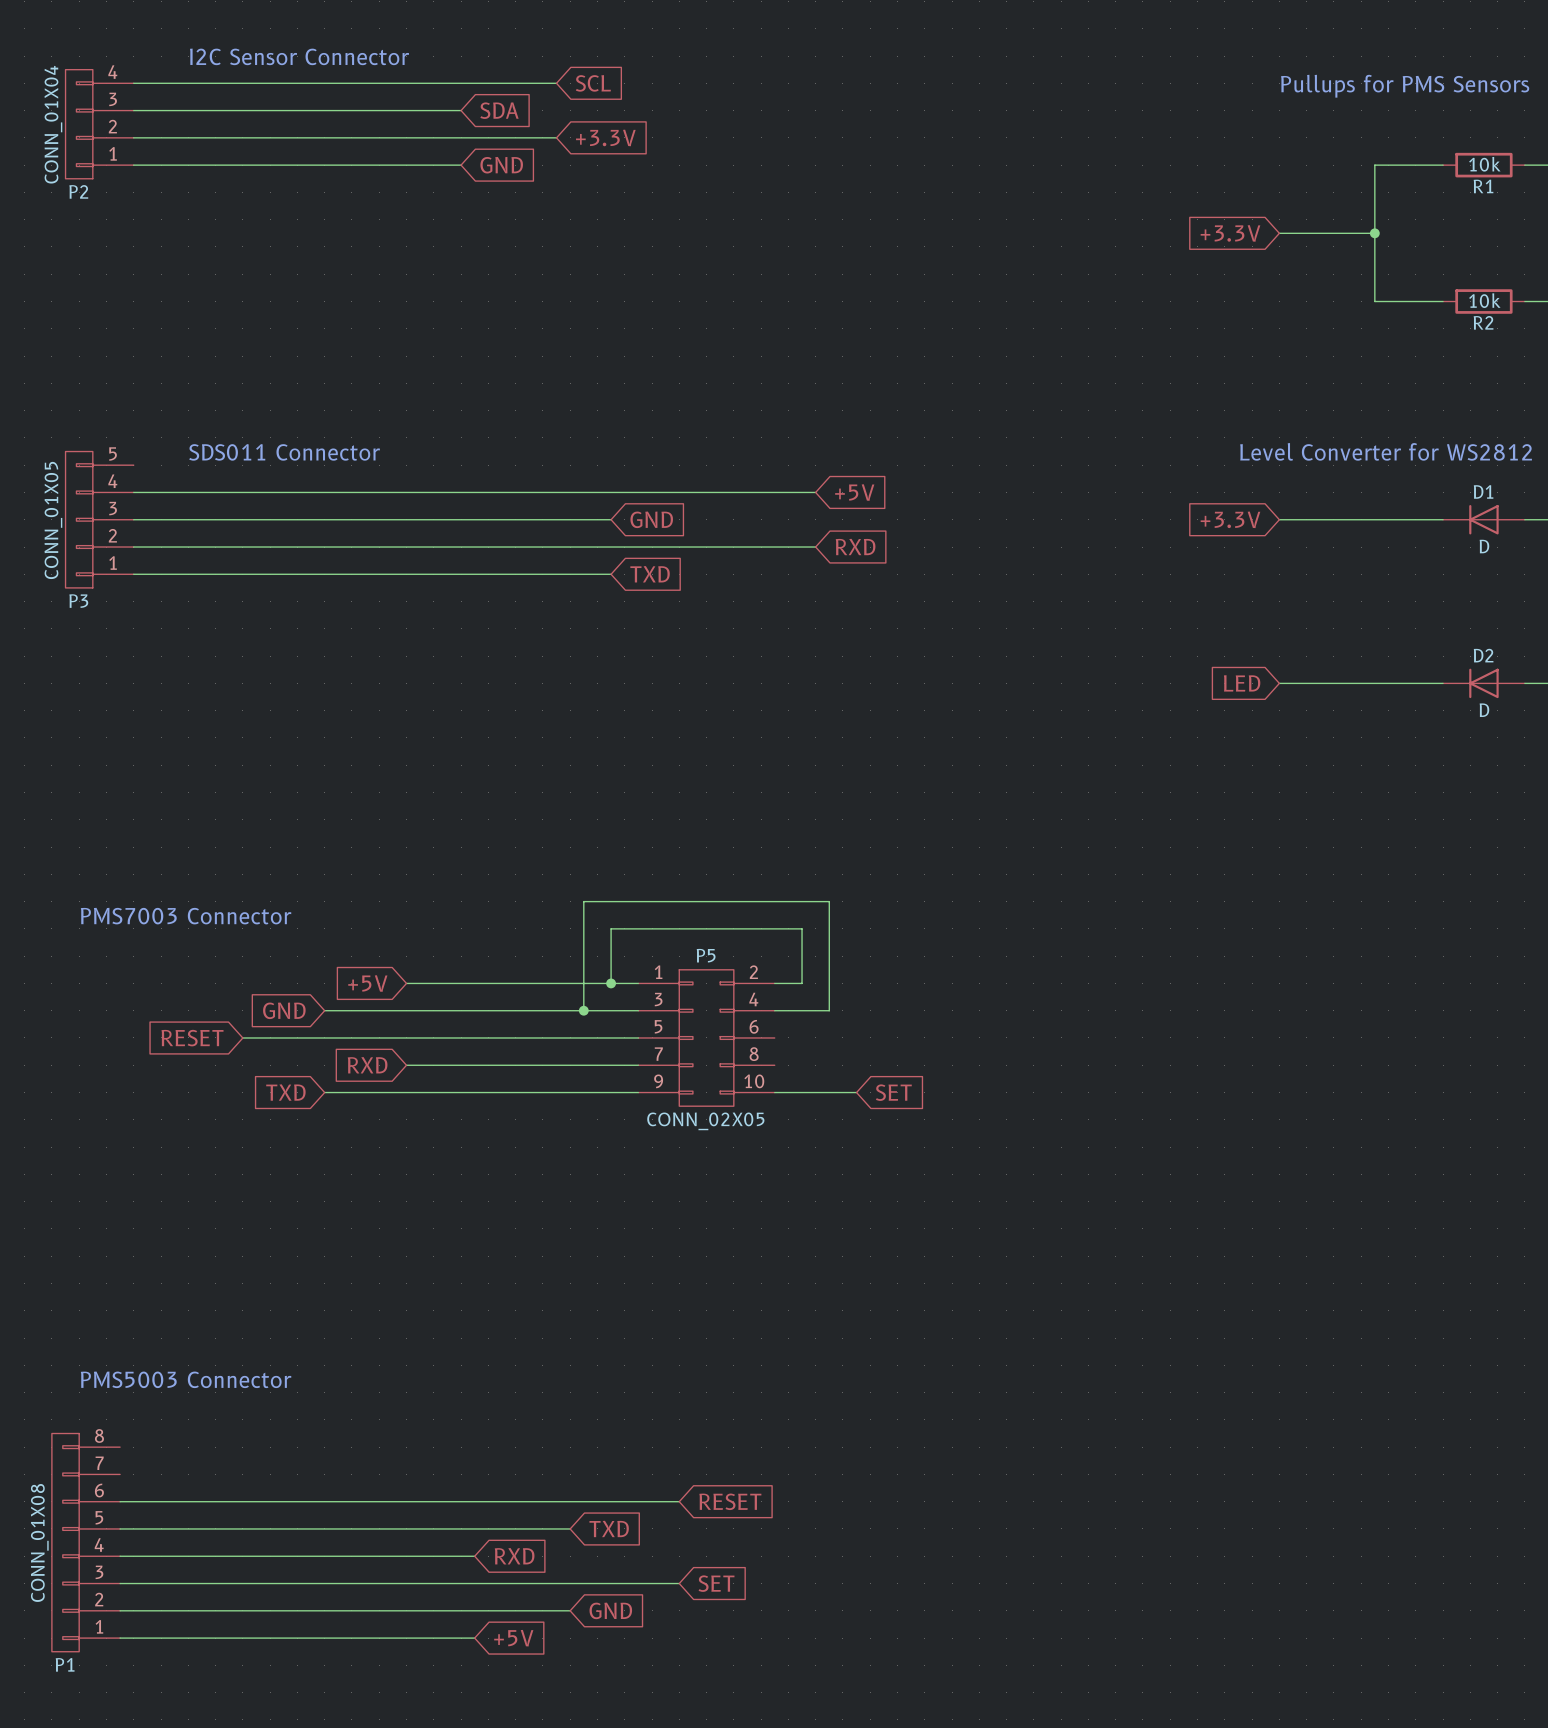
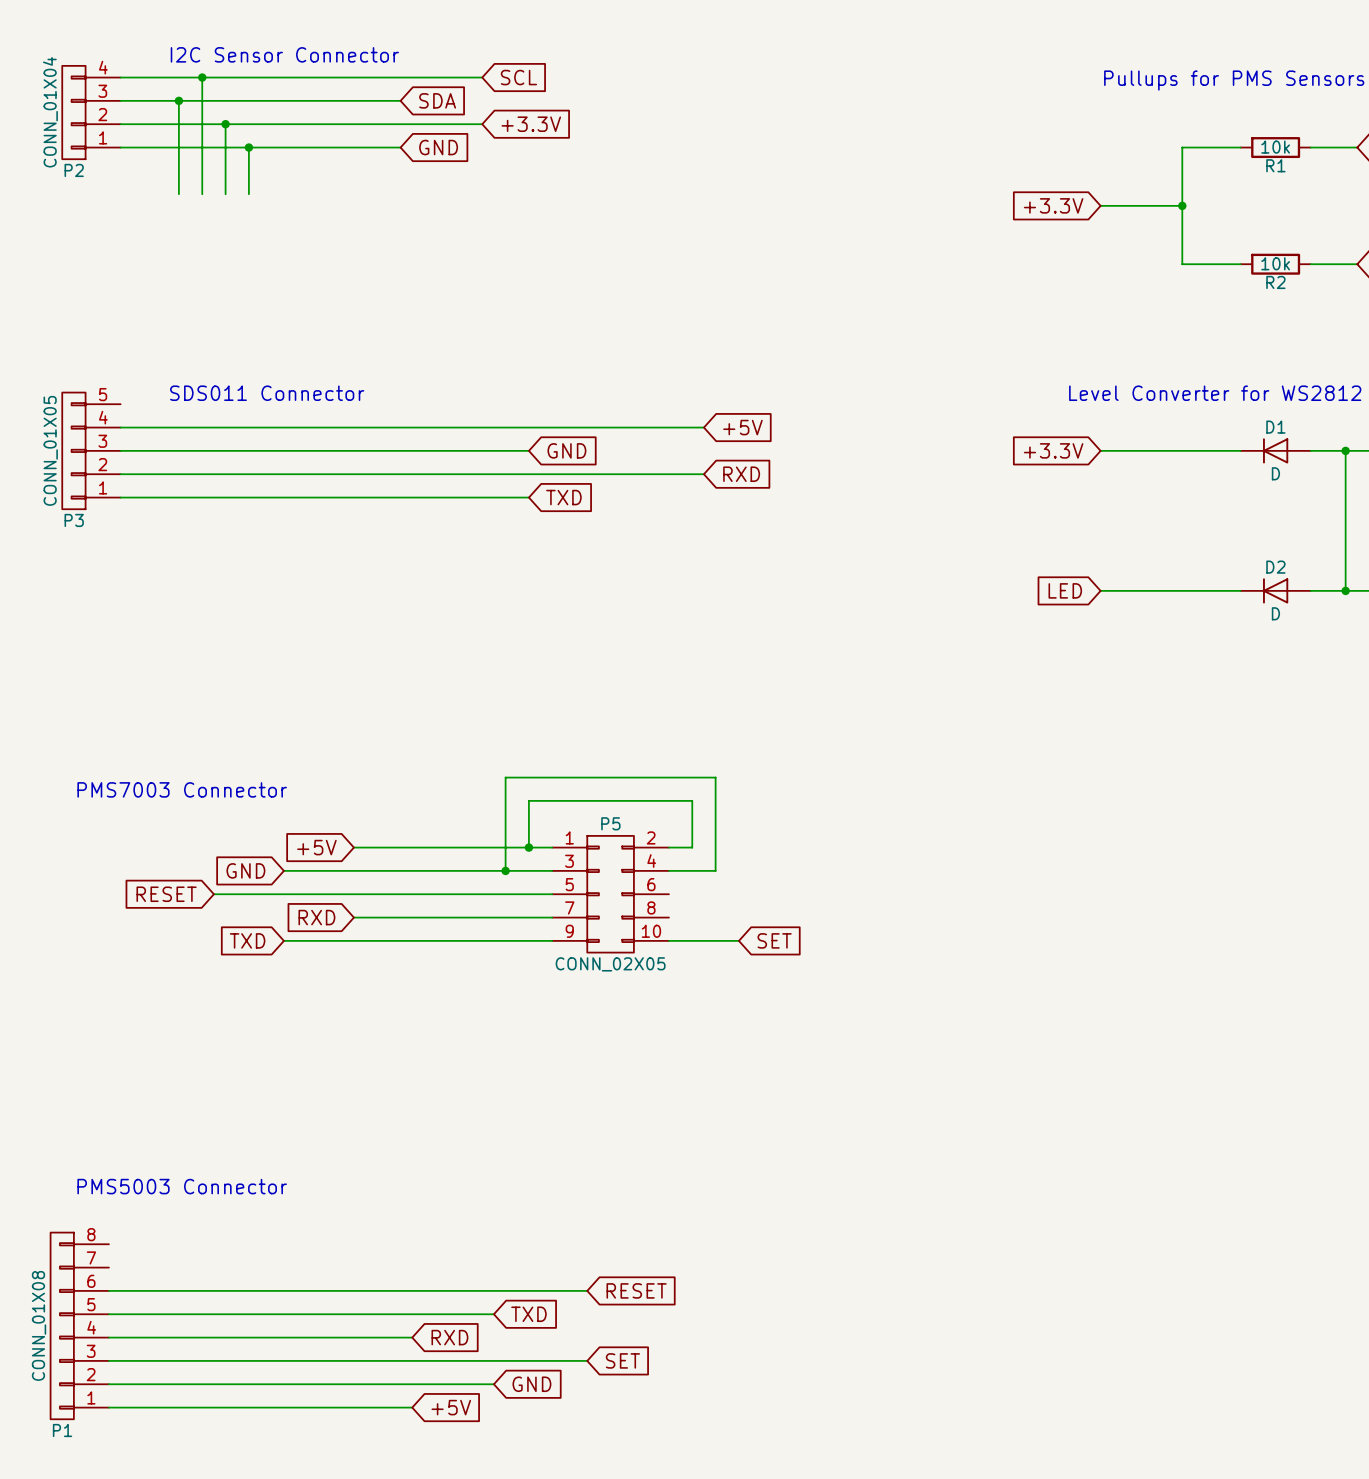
wire: none -> (202, 77) (202, 194)
junction: none -> (202, 77)
wire: none -> (178, 100) (178, 194)
junction: none -> (178, 100)
wire: none -> (225, 124) (225, 194)
junction: none -> (225, 124)
wire: none -> (248, 147) (248, 194)
junction: none -> (248, 147)

